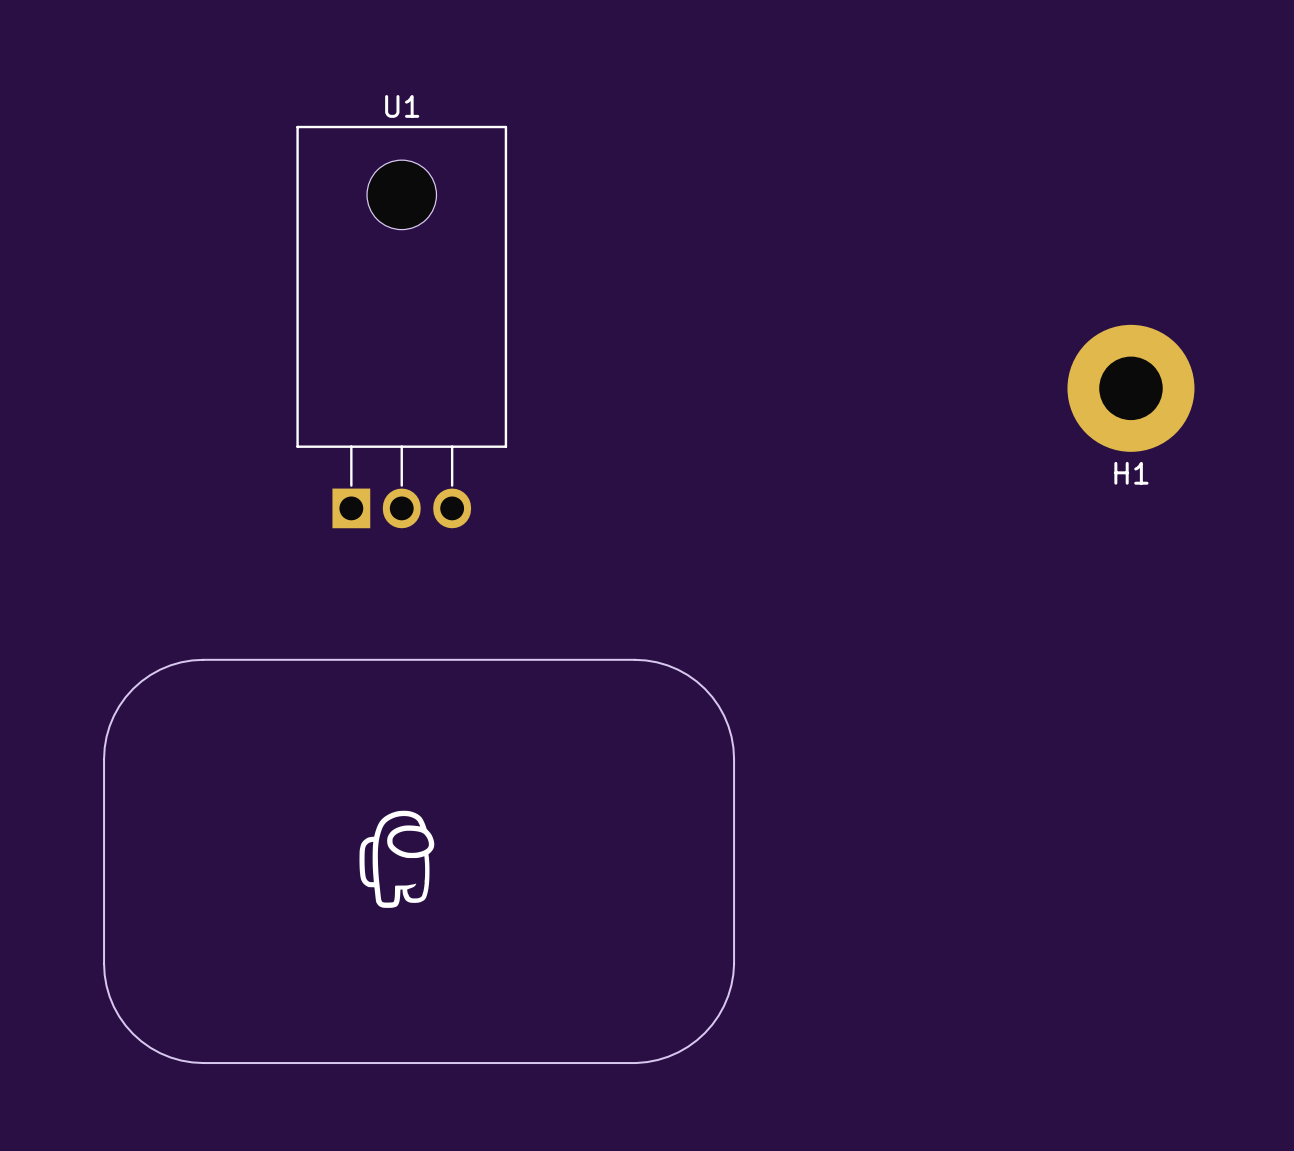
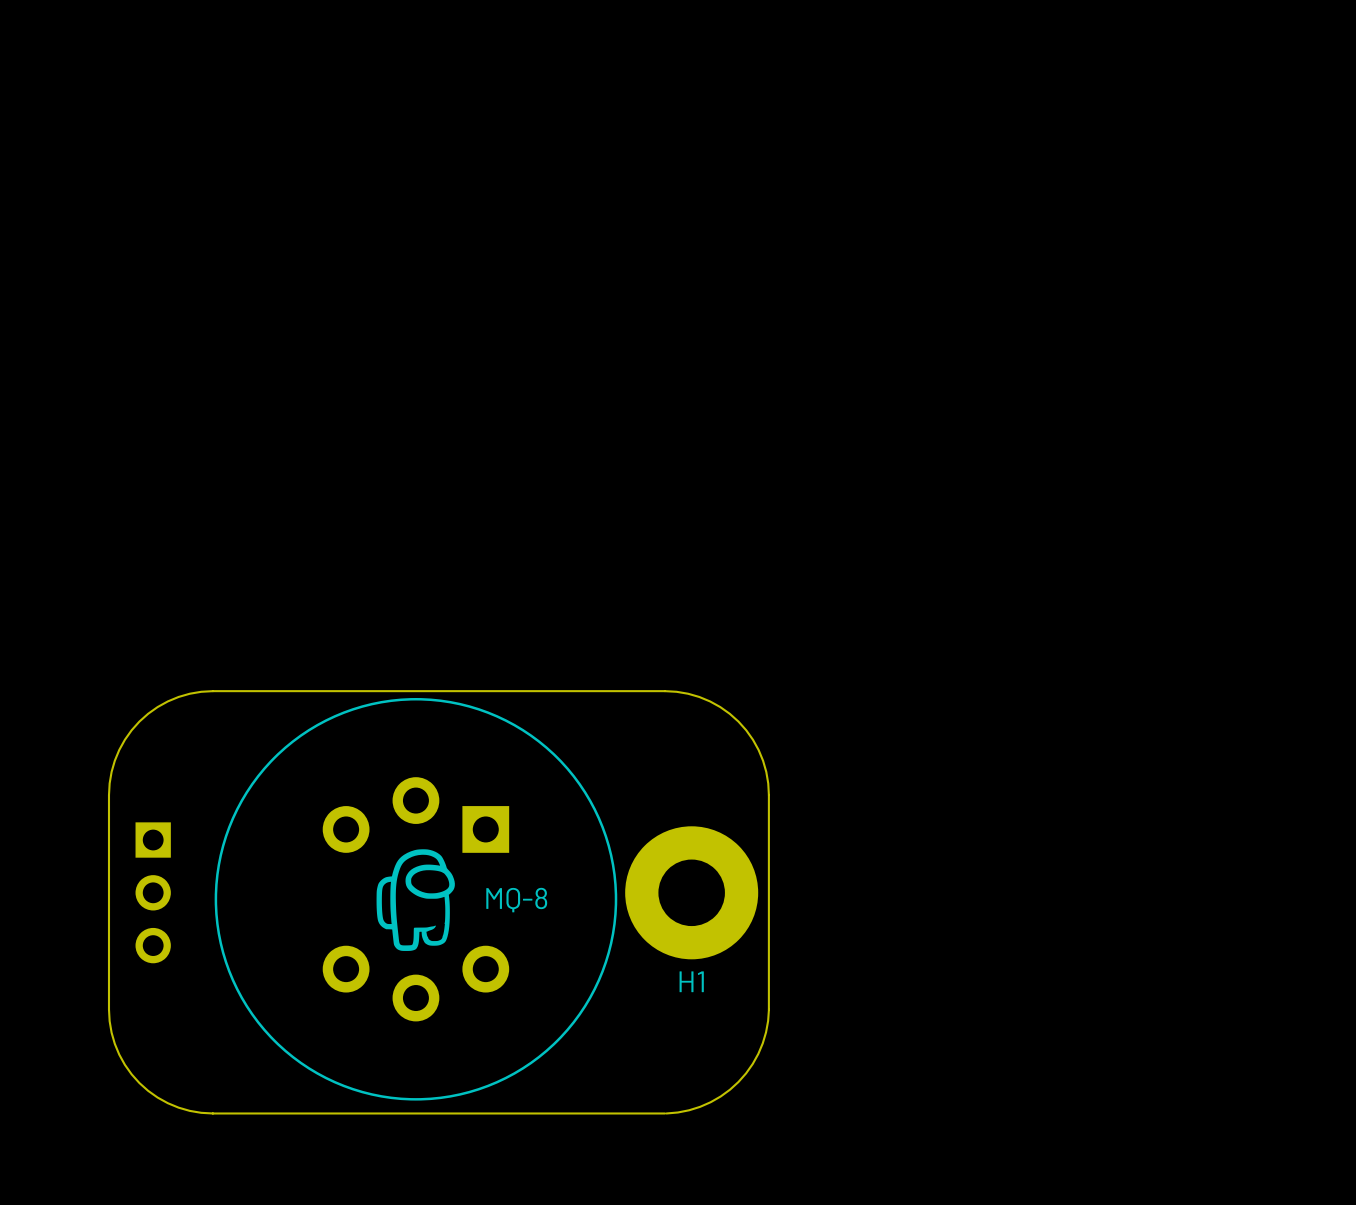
U1: (401, 327) -> none
H1 position: (1130, 388) -> (691, 892)
part: none -> (153, 892)
MQ-8: none -> (415, 899)

